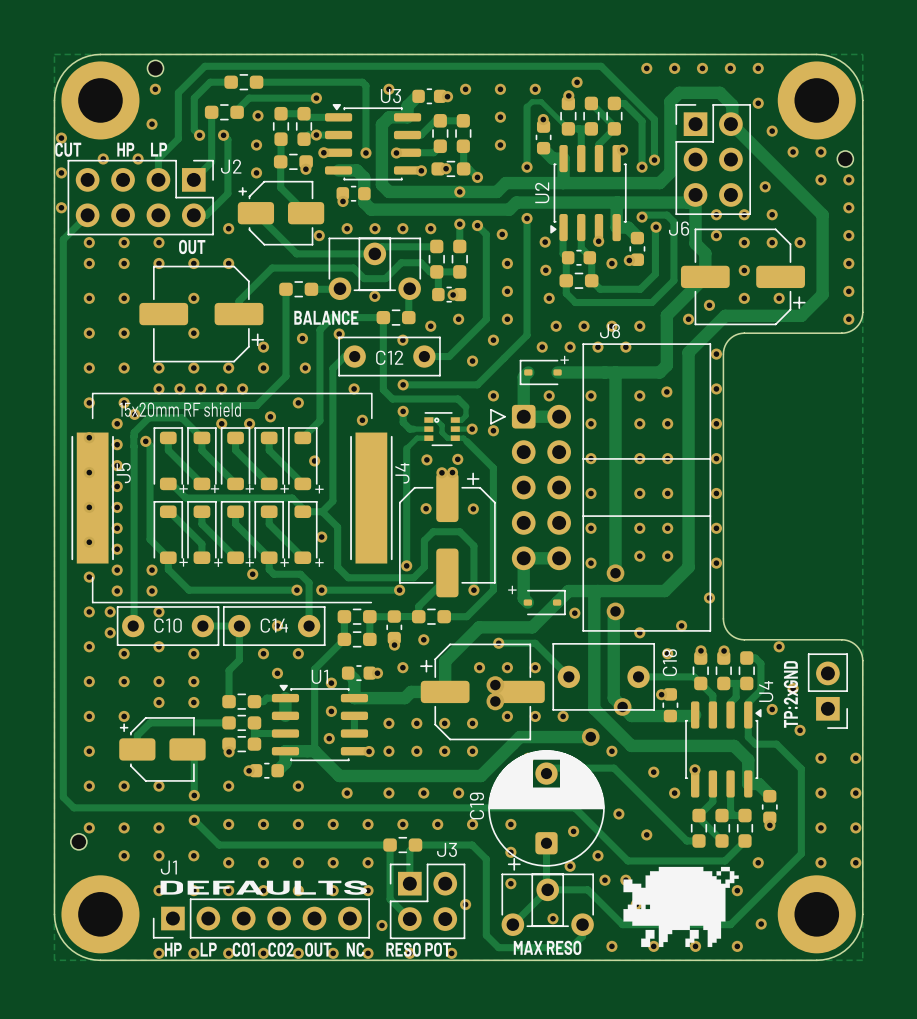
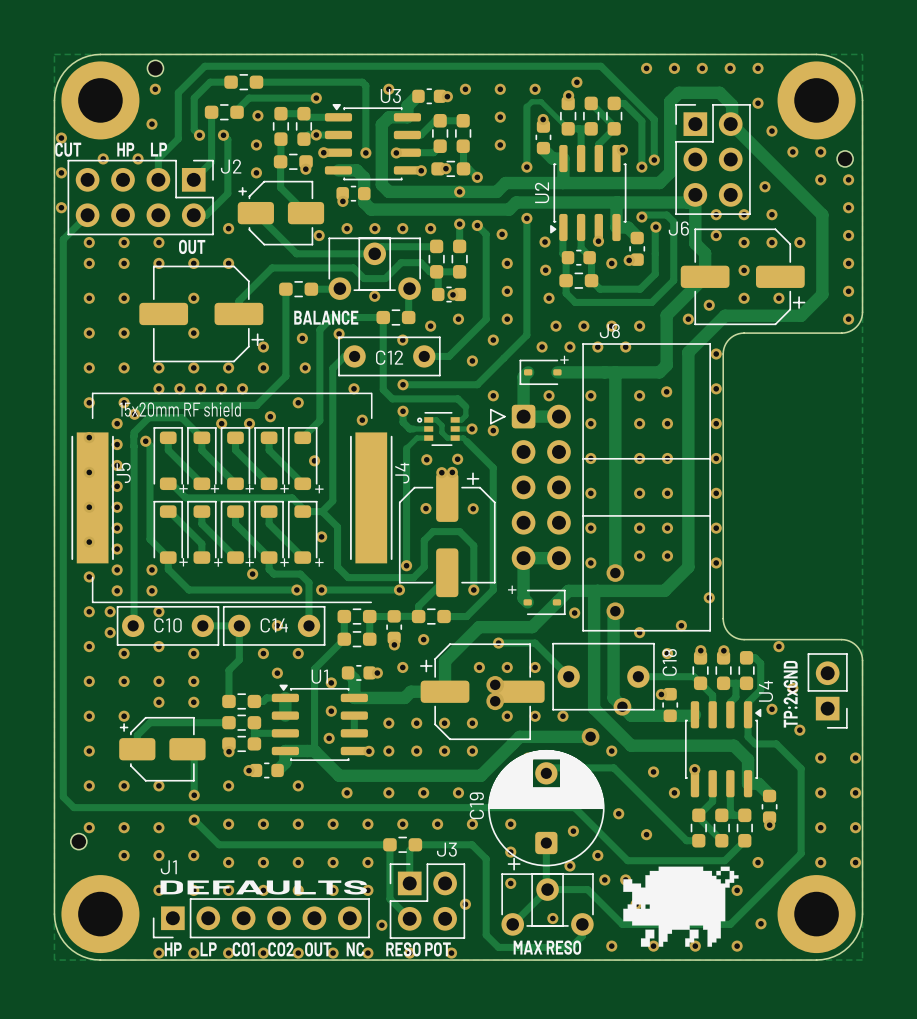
part footprint: [424, 412, 460, 447] -> [417, 411, 460, 446]

